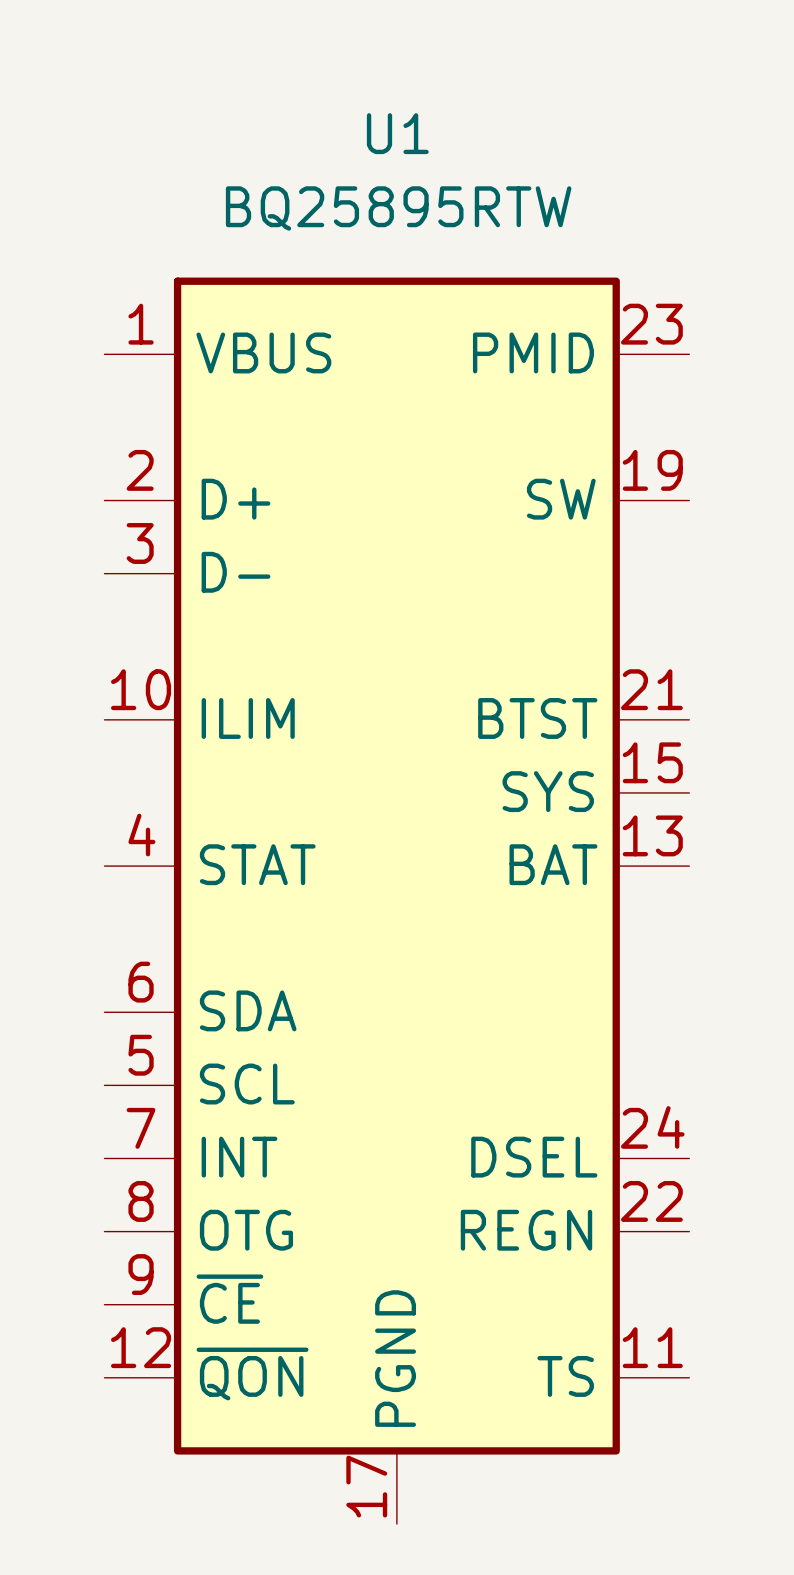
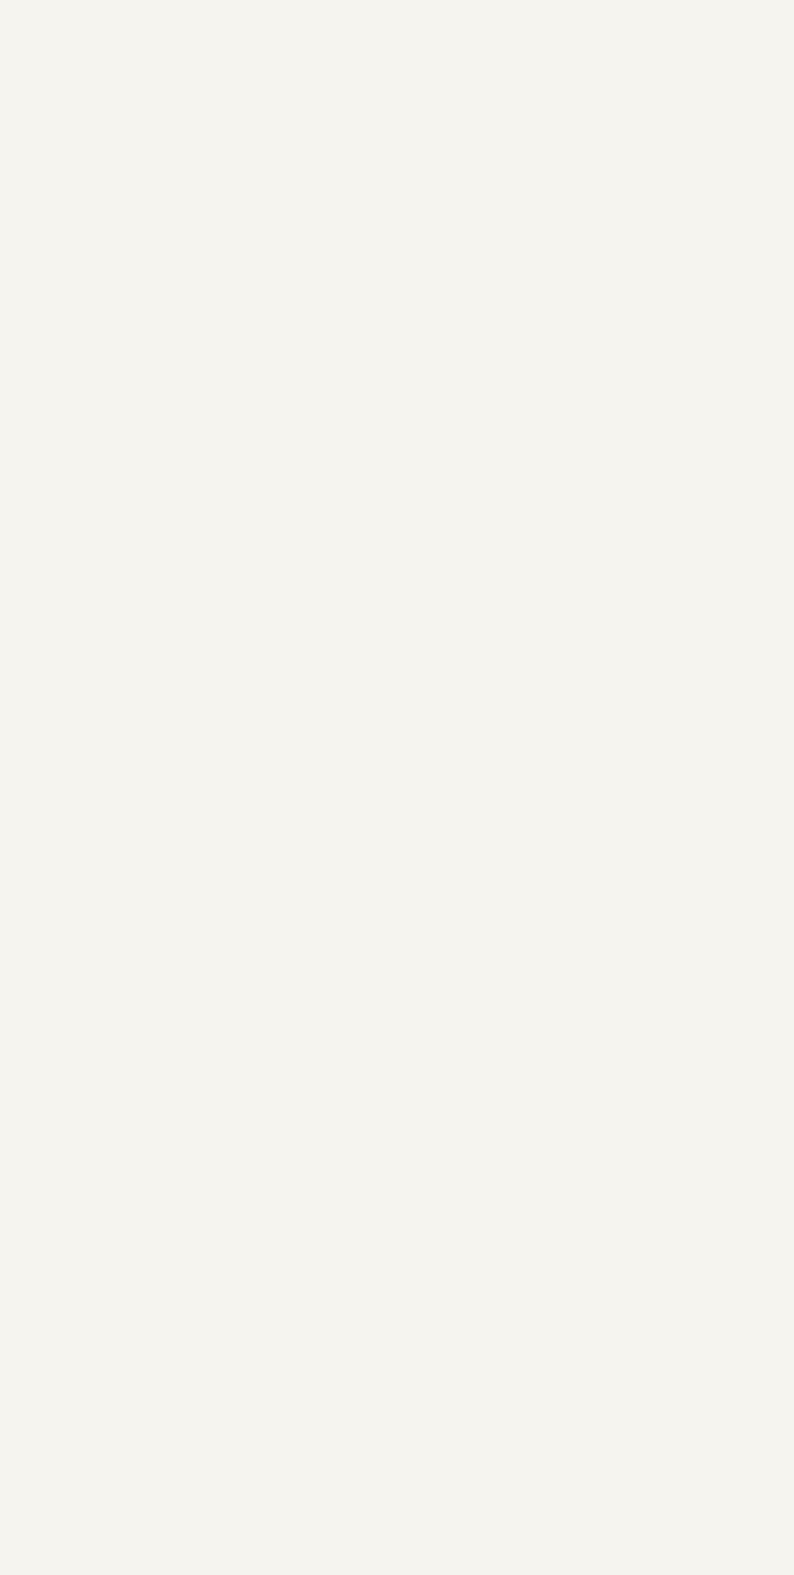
U1: BQ25895RTW (396, 900) -> none

